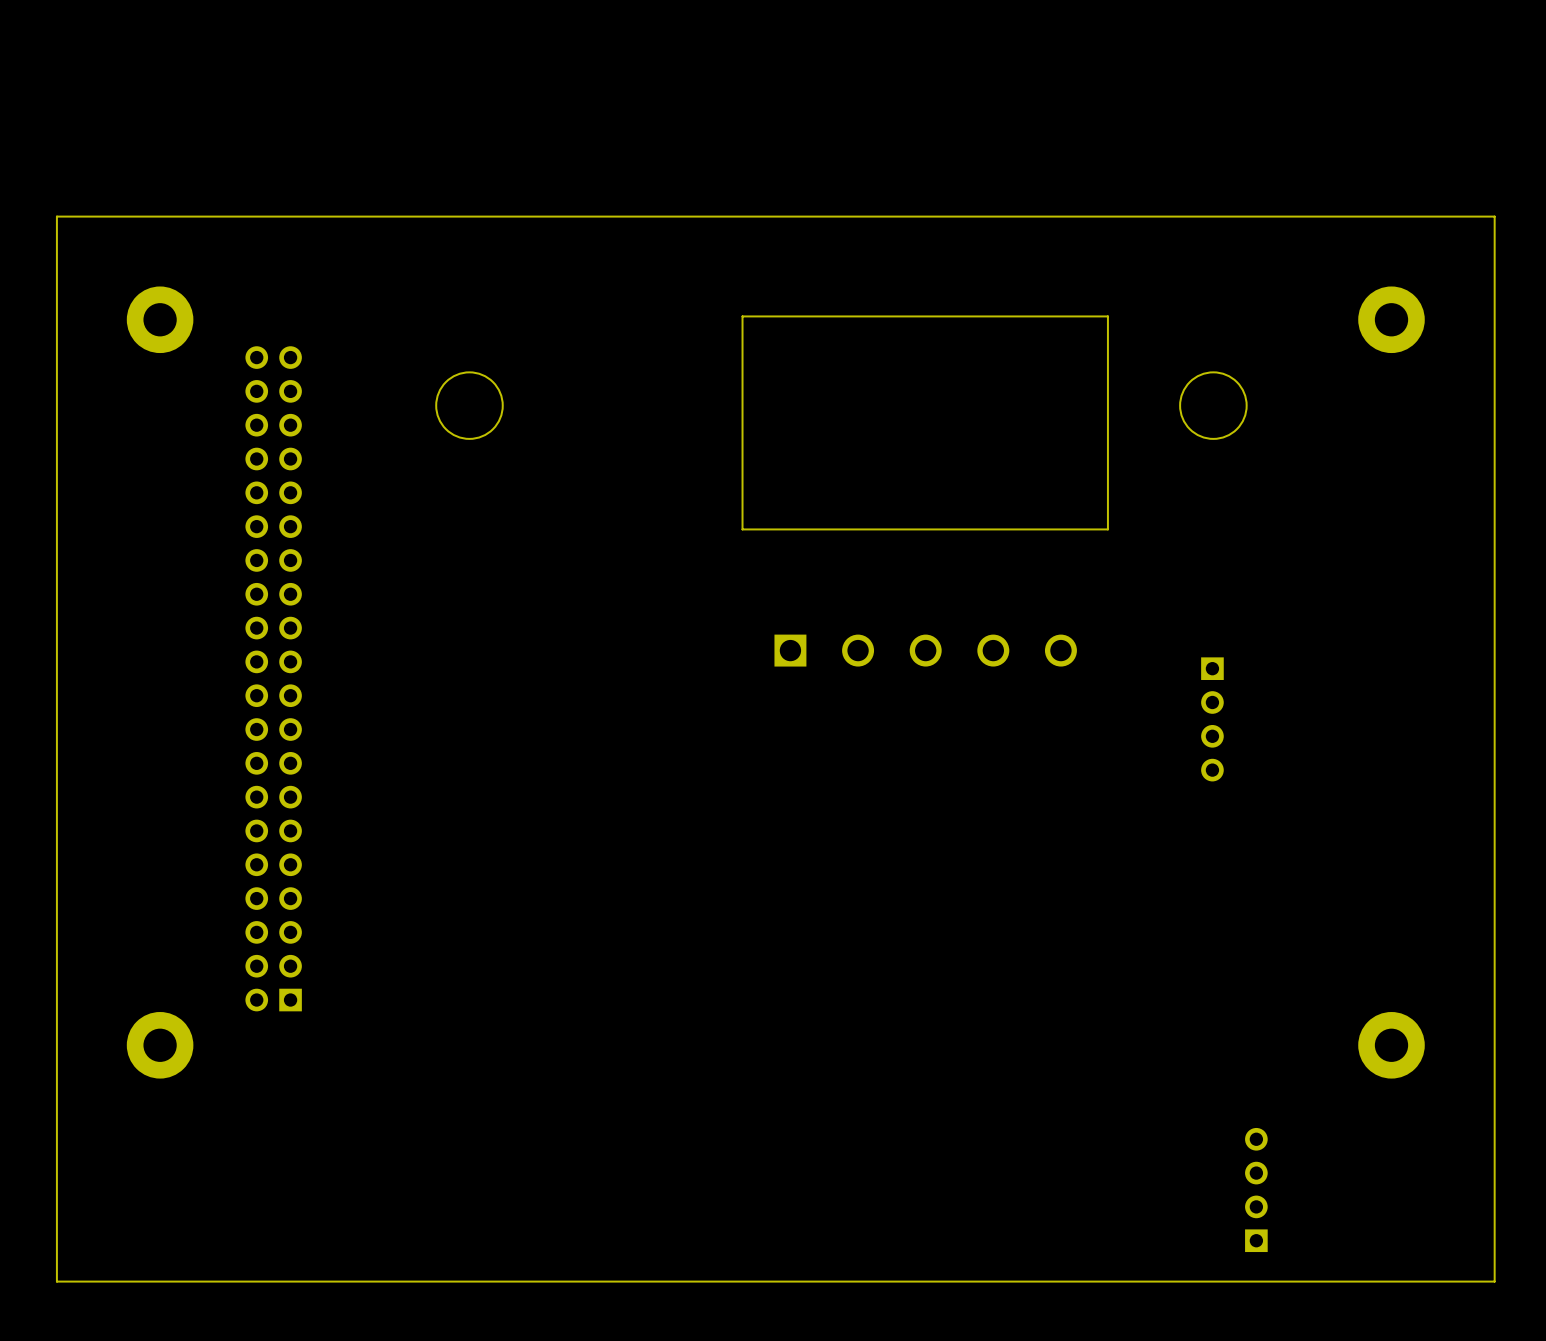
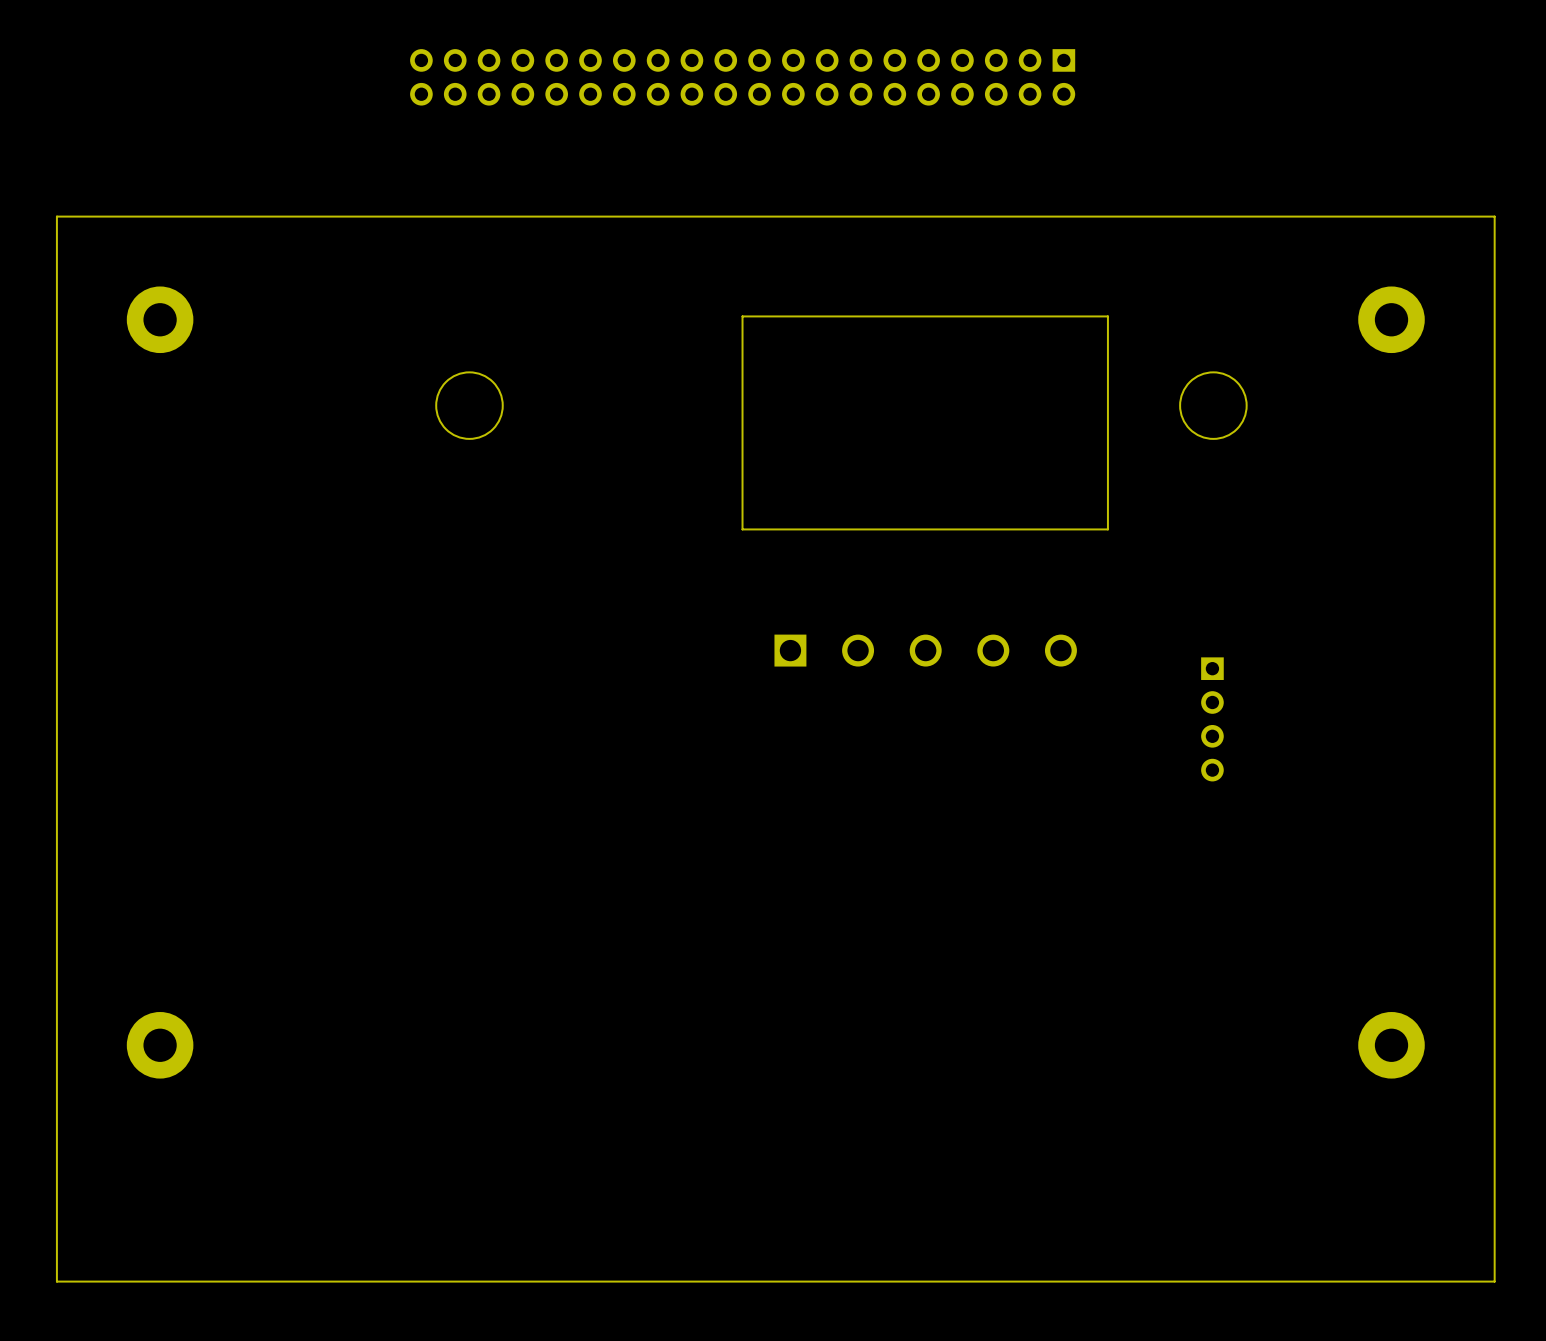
part: none -> (742, 77)
part: (273, 678) -> none
part: (1256, 1189) -> none

